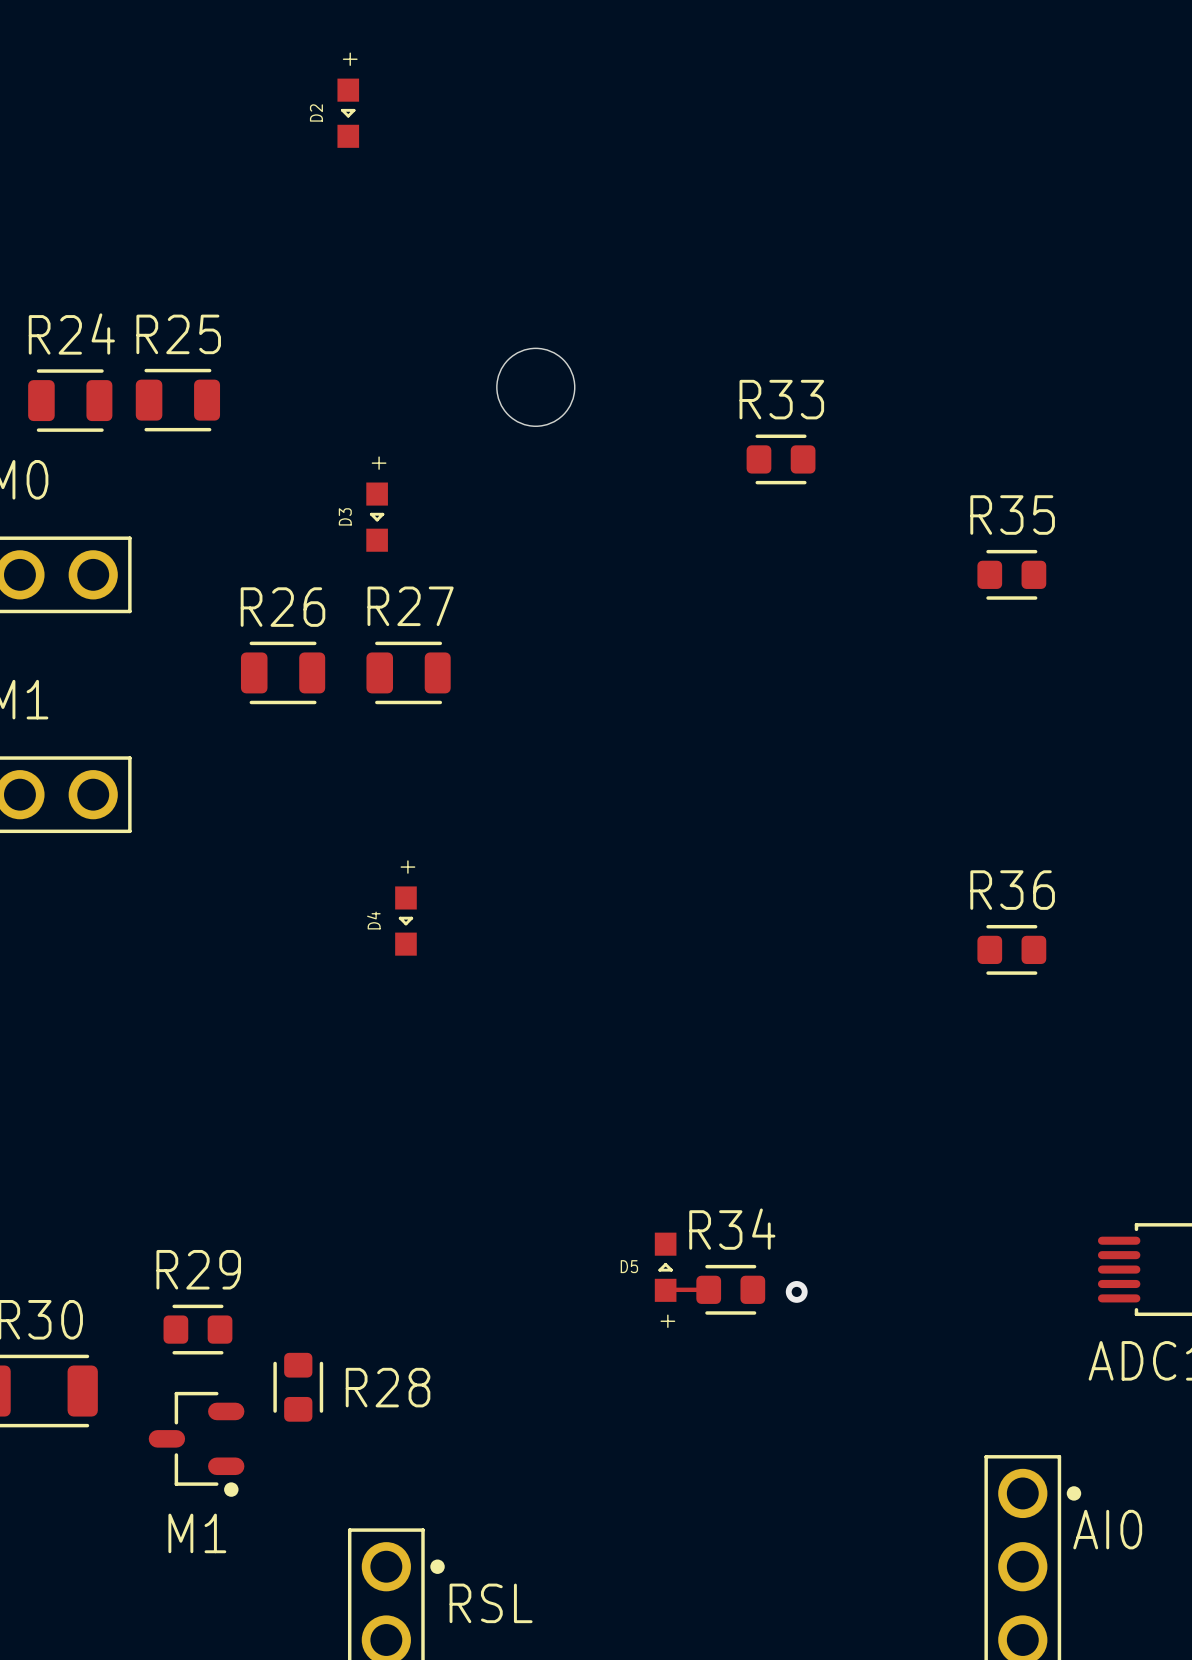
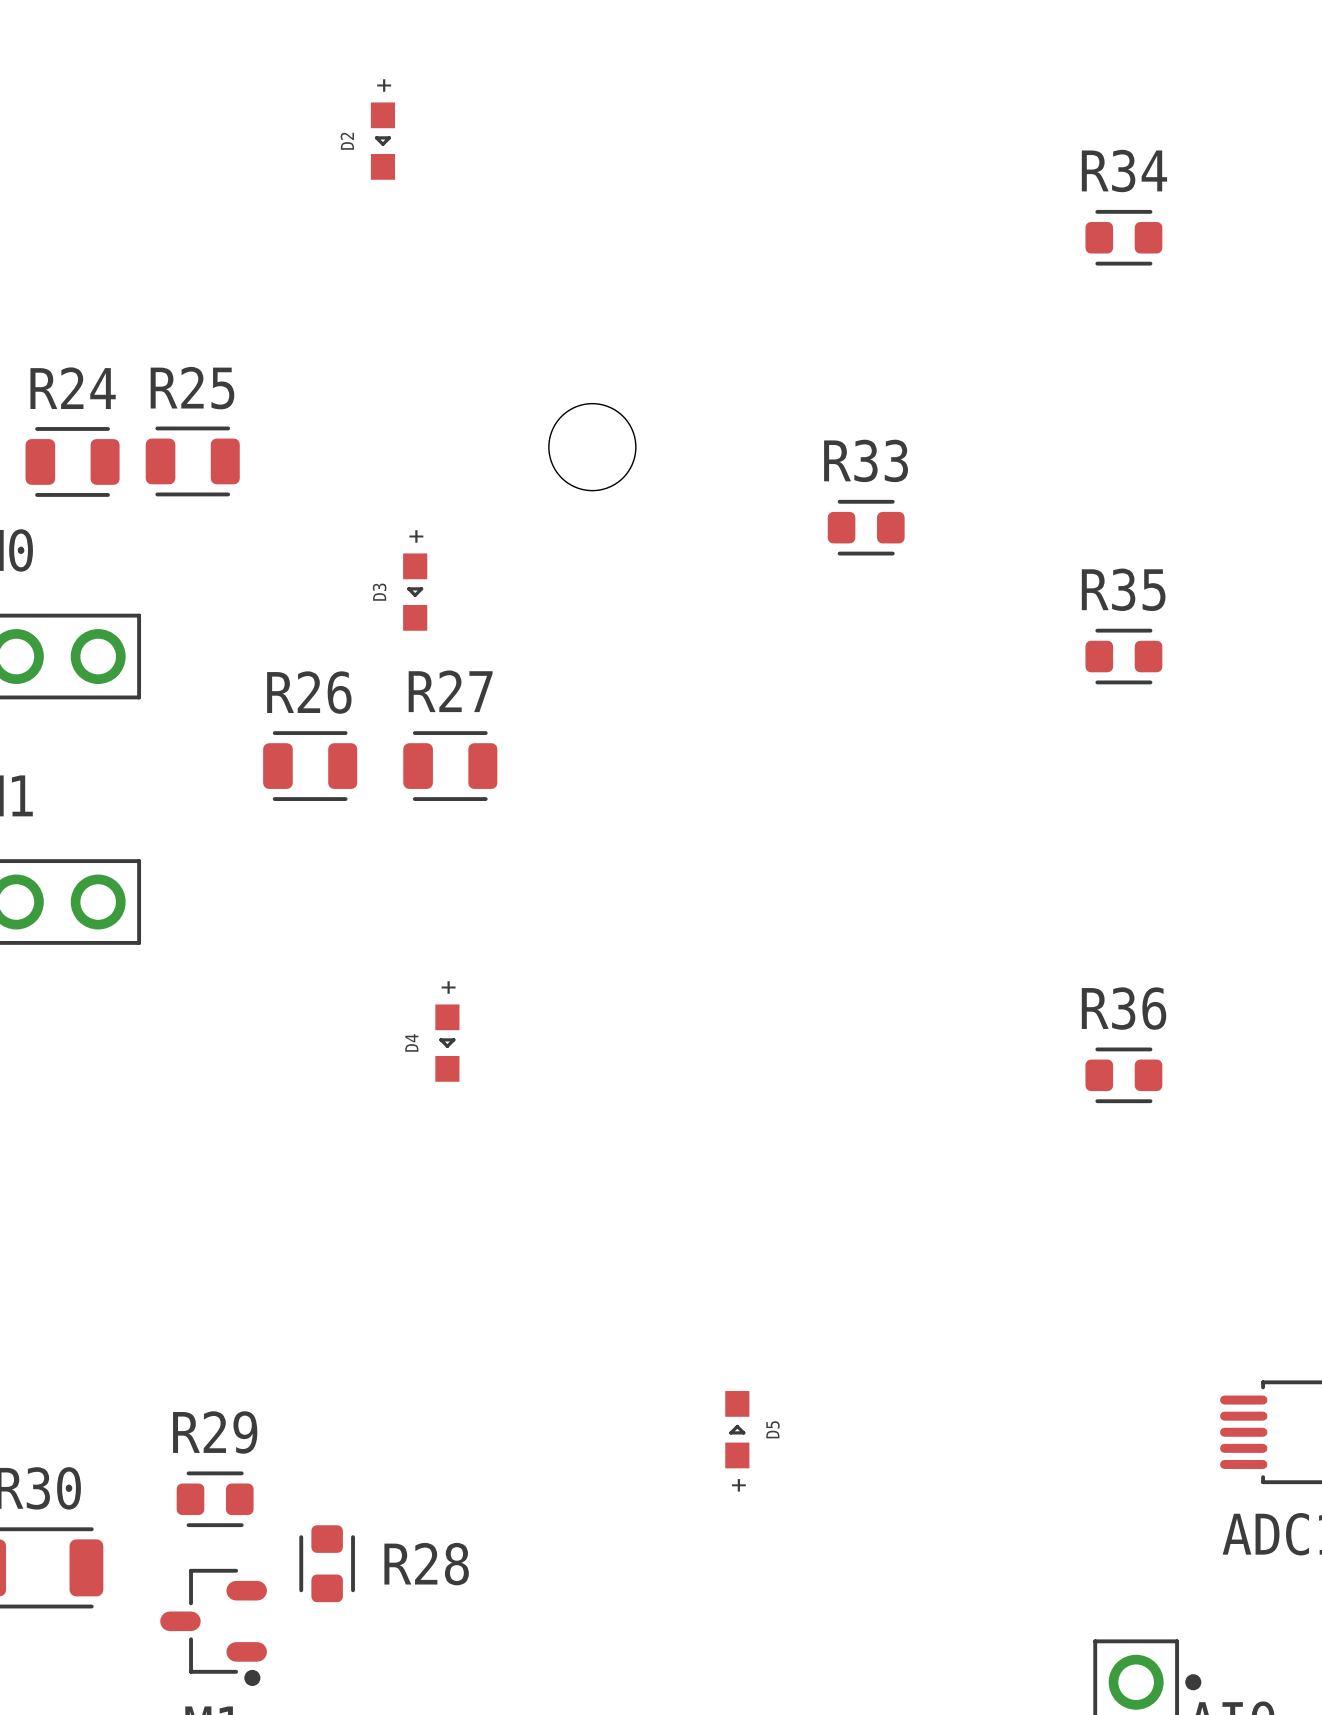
D5 name rotation: 0° (629, 1266) -> 90° counterclockwise (772, 1429)
D5 name position: D5 (629, 1266) -> D5 (772, 1429)
track: (708, 1289) (665, 1290) -> none
R34 position: (730, 1289) -> (1123, 237)
via: (796, 1291) -> none

